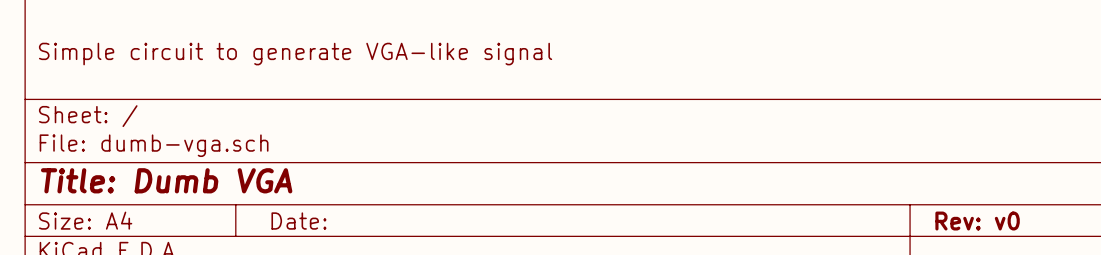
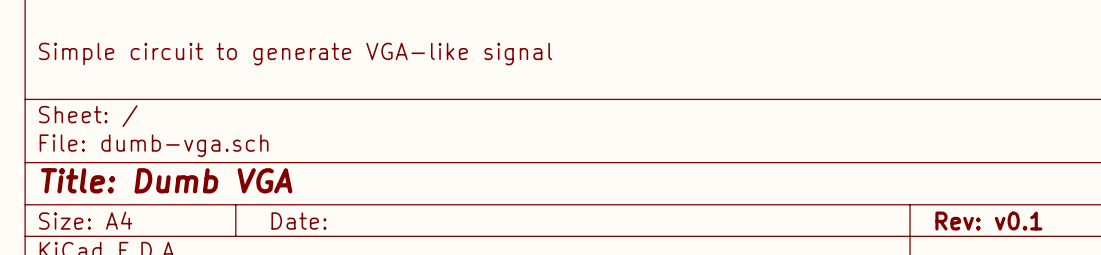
title block: Rev: v0 (977, 221) -> Rev: v0.1 (988, 221)

